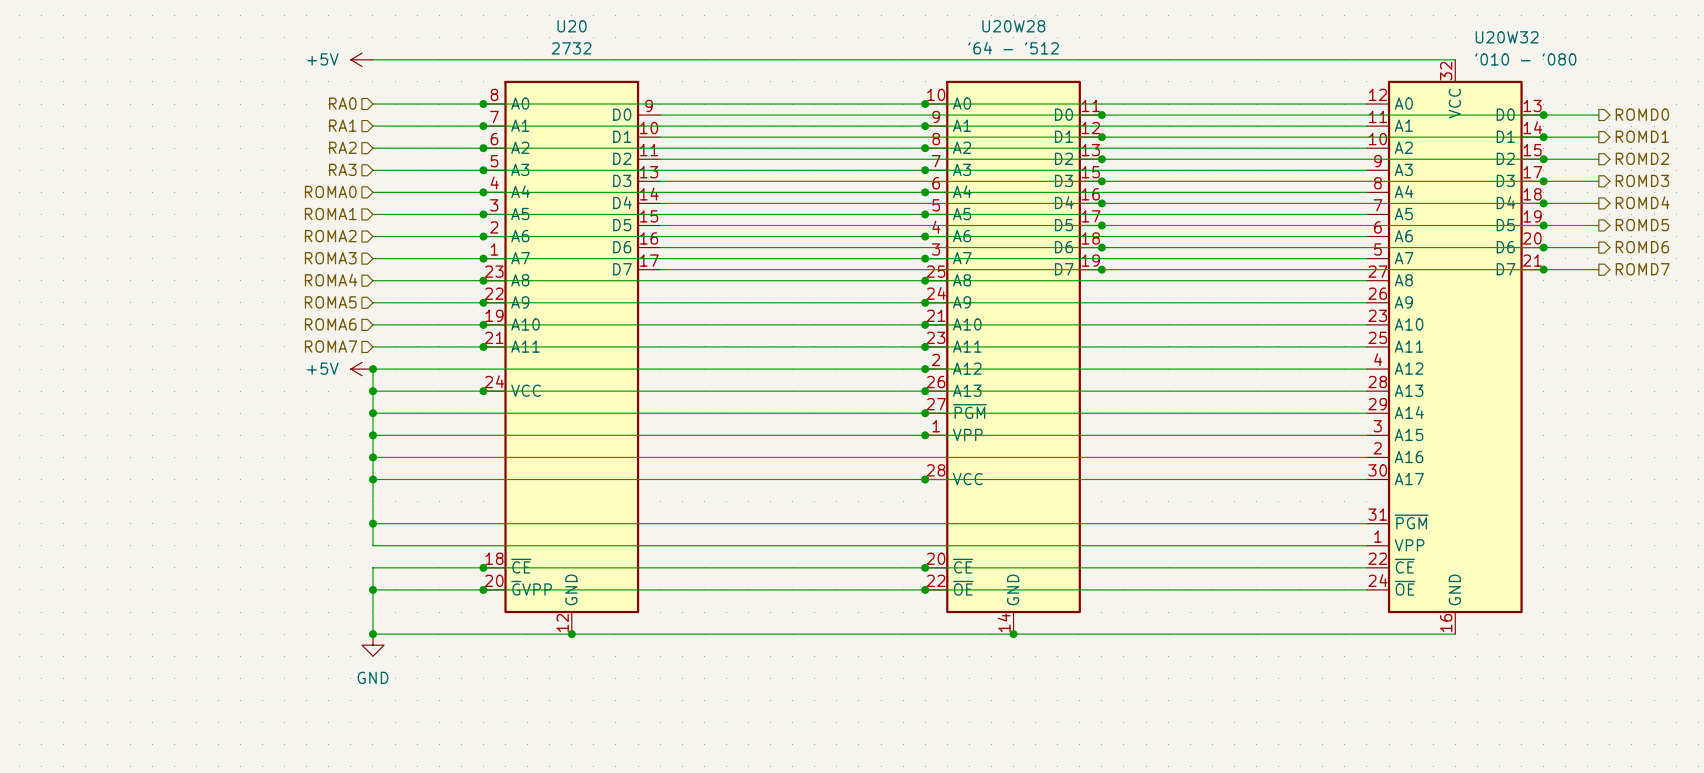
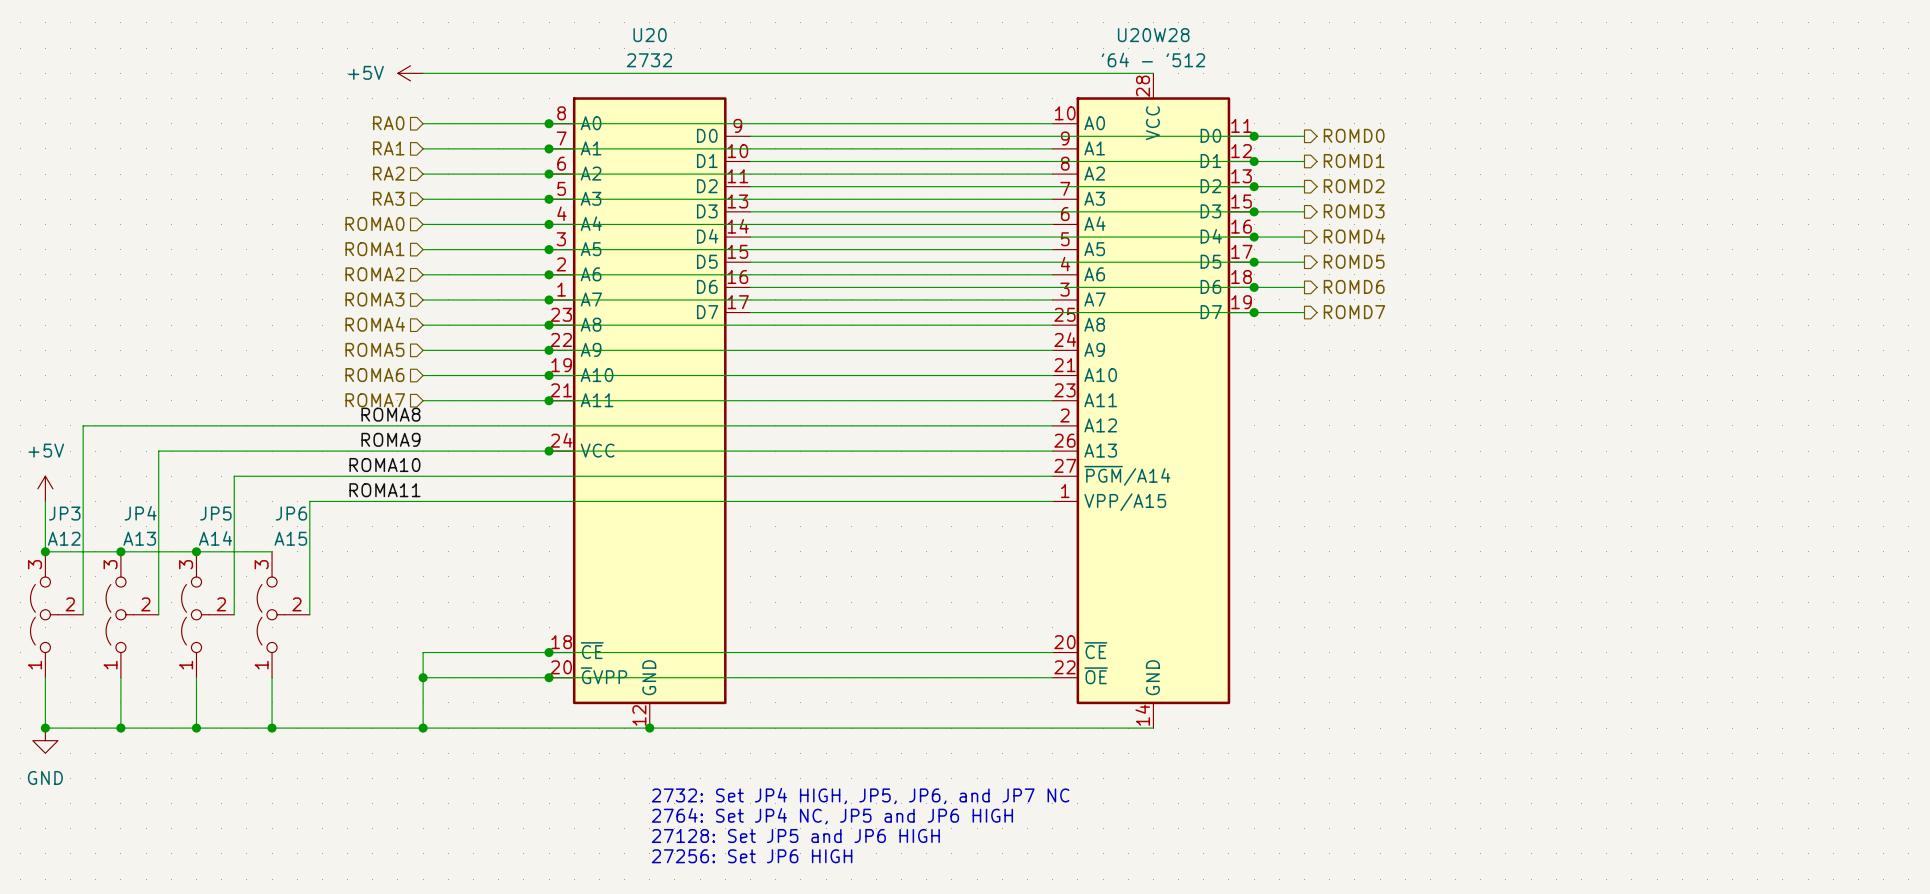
wire: (1013, 59) (1455, 59) -> none
U20W28 symbol: [925, 80, 1102, 635] -> [1052, 73, 1255, 729]
wire: (925, 104) (1366, 104) -> none
junction: (925, 104) -> none
hierarchical label: none -> ROMD0 (1354, 135)
hierarchical label: ROMD0 (1642, 114) -> none
wire: (1146, 115) (1598, 115) -> none
junction: (1543, 115) -> none
wire: (925, 126) (1366, 126) -> none
junction: (925, 126) -> none
hierarchical label: none -> ROMD1 (1354, 161)
hierarchical label: ROMD1 (1642, 136) -> none
wire: (1146, 137) (1598, 137) -> none
junction: (1543, 137) -> none
wire: (925, 148) (1366, 148) -> none
junction: (925, 148) -> none
hierarchical label: none -> ROMD2 (1354, 186)
hierarchical label: ROMD2 (1642, 158) -> none
wire: (1146, 159) (1598, 159) -> none
junction: (1543, 159) -> none
wire: (925, 170) (1366, 170) -> none
junction: (925, 170) -> none
hierarchical label: none -> ROMD3 (1354, 211)
hierarchical label: ROMD3 (1642, 180) -> none
wire: (1146, 181) (1598, 181) -> none
junction: (1543, 181) -> none
wire: (925, 192) (1366, 192) -> none
junction: (925, 192) -> none
hierarchical label: none -> ROMD4 (1354, 236)
hierarchical label: ROMD4 (1642, 202) -> none
wire: (1146, 203) (1598, 203) -> none
junction: (1543, 203) -> none
wire: (925, 214) (1366, 214) -> none
junction: (925, 214) -> none
wire: (1146, 225) (1598, 225) -> none
hierarchical label: none -> ROMD5 (1354, 261)
junction: (1543, 225) -> none
hierarchical label: ROMD5 (1642, 225) -> none
wire: (925, 236) (1366, 236) -> none
junction: (925, 236) -> none
wire: (1146, 247) (1598, 247) -> none
hierarchical label: none -> ROMD6 (1354, 286)
junction: (1543, 247) -> none
hierarchical label: ROMD6 (1642, 247) -> none
wire: (925, 258) (1366, 258) -> none
junction: (925, 258) -> none
wire: (1146, 269) (1598, 269) -> none
hierarchical label: none -> ROMD7 (1354, 312)
junction: (1543, 269) -> none
hierarchical label: ROMD7 (1642, 269) -> none
wire: (925, 280) (1366, 280) -> none
junction: (925, 280) -> none
wire: (925, 302) (1366, 302) -> none
junction: (925, 302) -> none
wire: (925, 324) (1366, 324) -> none
junction: (925, 324) -> none
wire: (925, 346) (1366, 346) -> none
junction: (925, 346) -> none
U20W32: '010 - '080 (1455, 346) -> none
label: none -> ROMA8 (390, 414)
power symbol: +5V (361, 369) -> none
wire: (372, 369) (372, 545) (1366, 545) -> (423, 425) (83, 425) (83, 614)
junction: (372, 369) -> none
wire: (925, 369) (1366, 369) -> none
junction: (925, 369) -> none
label: none -> ROMA9 (390, 439)
wire: none -> (423, 451) (158, 451) (158, 614)
junction: (372, 391) -> none
wire: (925, 391) (1366, 391) -> none
junction: (925, 391) -> none
label: none -> ROMA10 (384, 465)
wire: none -> (423, 476) (234, 476) (234, 614)
junction: (372, 413) -> none
wire: (925, 413) (1366, 413) -> none
junction: (925, 413) -> none
power symbol: none -> +5V (45, 488)
label: none -> ROMA11 (384, 490)
wire: none -> (45, 501) (45, 551) (272, 551)
wire: none -> (423, 501) (309, 501) (309, 614)
junction: (372, 435) -> none
wire: (925, 435) (1366, 435) -> none
junction: (925, 435) -> none
wire: (372, 457) (1366, 457) -> none
junction: (372, 457) -> none
junction: none -> (45, 551)
junction: none -> (120, 551)
junction: none -> (196, 551)
wire: (372, 479) (1366, 479) -> none
junction: (372, 479) -> none
junction: (925, 479) -> none
wire: (372, 523) (1366, 523) -> none
junction: (372, 523) -> none
JP3: none -> A12 (56, 614)
JP4: none -> A13 (132, 614)
JP5: none -> A14 (207, 614)
JP6: none -> A15 (283, 614)
wire: (925, 567) (1366, 567) -> none
junction: (925, 567) -> none
wire: none -> (45, 677) (45, 728) (423, 728)
wire: none -> (120, 677) (120, 728)
wire: none -> (196, 677) (196, 728)
wire: none -> (272, 677) (272, 728)
wire: (925, 589) (1366, 589) -> none
junction: (925, 589) -> none
junction: none -> (45, 728)
junction: none -> (120, 728)
junction: none -> (196, 728)
junction: none -> (272, 728)
wire: (1013, 634) (1455, 634) -> none
junction: (1013, 634) -> none
power symbol: none -> GND (45, 740)
power symbol: GND (372, 645) -> none
text: none -> 2732: Set JP4 HIGH, JP5, JP6, and JP7 NC (860, 796)
text: none -> 2764: Set JP4 NC, JP5 and JP6 HIGH (832, 816)
text: none -> 27128: Set JP5 and JP6 HIGH (795, 836)
text: none -> 27256: Set JP6 HIGH (752, 856)

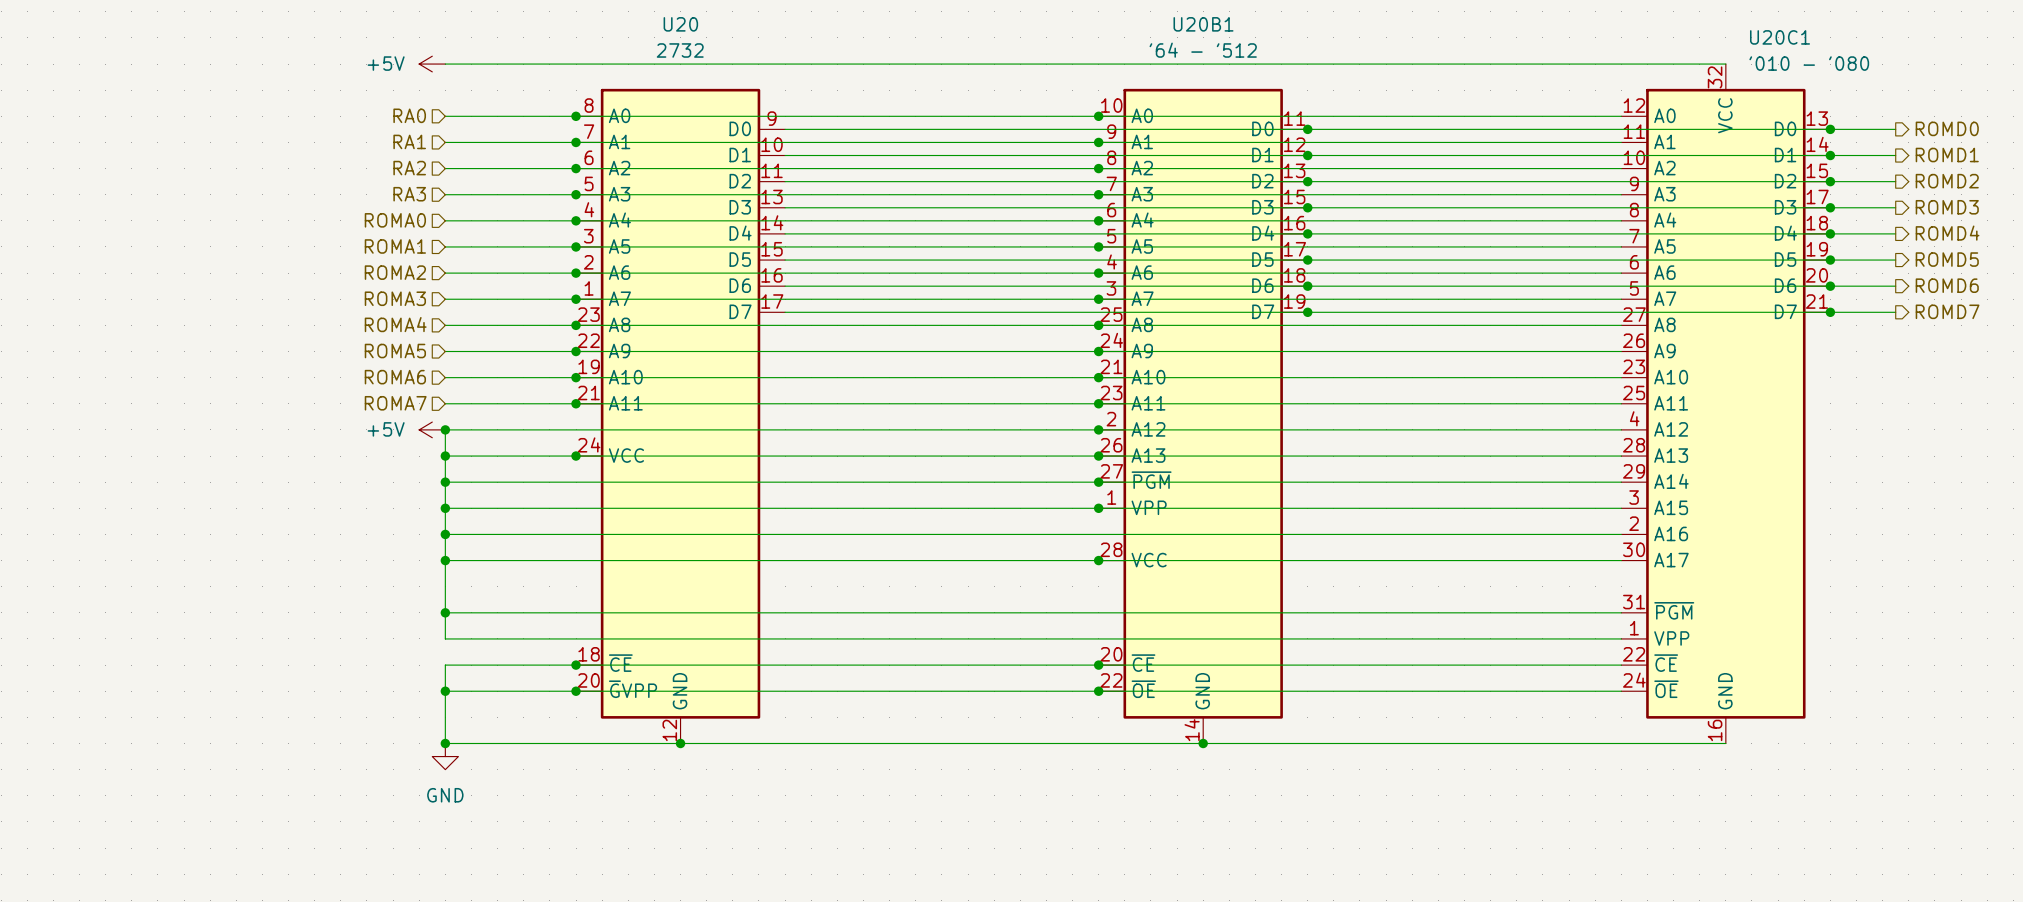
wire: none -> (1203, 64) (1725, 64)
wire: none -> (1098, 116) (1621, 116)
junction: none -> (1098, 116)
hierarchical label: ROMD0 (1354, 135) -> none
hierarchical label: none -> ROMD0 (1947, 128)
wire: none -> (1359, 129) (1895, 129)
junction: none -> (1830, 129)
wire: none -> (1098, 142) (1621, 142)
junction: none -> (1098, 142)
wire: none -> (1359, 155) (1895, 155)
hierarchical label: ROMD1 (1354, 161) -> none
junction: none -> (1830, 155)
hierarchical label: none -> ROMD1 (1947, 155)
wire: none -> (1098, 168) (1621, 168)
junction: none -> (1098, 168)
wire: none -> (1359, 181) (1895, 181)
hierarchical label: ROMD2 (1354, 186) -> none
junction: none -> (1830, 181)
hierarchical label: none -> ROMD2 (1947, 181)
wire: none -> (1098, 194) (1621, 194)
junction: none -> (1098, 194)
wire: none -> (1359, 207) (1895, 207)
hierarchical label: ROMD3 (1354, 211) -> none
junction: none -> (1830, 207)
hierarchical label: none -> ROMD3 (1947, 207)
wire: none -> (1098, 220) (1621, 220)
junction: none -> (1098, 220)
hierarchical label: ROMD4 (1354, 236) -> none
hierarchical label: none -> ROMD4 (1947, 233)
wire: none -> (1359, 233) (1895, 233)
junction: none -> (1830, 233)
wire: none -> (1098, 246) (1621, 246)
junction: none -> (1098, 246)
hierarchical label: ROMD5 (1354, 261) -> none
hierarchical label: none -> ROMD5 (1947, 259)
wire: none -> (1359, 260) (1895, 260)
junction: none -> (1830, 260)
wire: none -> (1098, 273) (1621, 273)
junction: none -> (1098, 273)
hierarchical label: ROMD6 (1354, 286) -> none
hierarchical label: none -> ROMD6 (1947, 285)
wire: none -> (1359, 286) (1895, 286)
junction: none -> (1830, 286)
wire: none -> (1098, 299) (1621, 299)
junction: none -> (1098, 299)
wire: none -> (1359, 312) (1895, 312)
hierarchical label: ROMD7 (1354, 312) -> none
junction: none -> (1830, 312)
hierarchical label: none -> ROMD7 (1947, 311)
wire: none -> (1098, 325) (1621, 325)
junction: none -> (1098, 325)
wire: none -> (1098, 351) (1621, 351)
junction: none -> (1098, 351)
wire: none -> (1098, 377) (1621, 377)
junction: none -> (1098, 377)
wire: none -> (1098, 403) (1621, 403)
junction: none -> (1098, 403)
U20W28: '64 - '512 (1153, 400) -> none
U20C1: none -> '010 - '080 (1725, 403)
U20B1: none -> '64 - '512 (1203, 416)
label: ROMA8 (390, 414) -> none
power symbol: none -> +5V (432, 429)
wire: (423, 425) (83, 425) (83, 614) -> (445, 429) (445, 638) (1621, 638)
junction: none -> (445, 429)
wire: none -> (1098, 429) (1621, 429)
junction: none -> (1098, 429)
label: ROMA9 (390, 439) -> none
wire: (423, 451) (158, 451) (158, 614) -> none
junction: none -> (445, 456)
wire: none -> (1098, 456) (1621, 456)
junction: none -> (1098, 456)
label: ROMA10 (384, 465) -> none
wire: (423, 476) (234, 476) (234, 614) -> none
junction: none -> (445, 482)
wire: none -> (1098, 482) (1621, 482)
junction: none -> (1098, 482)
power symbol: +5V (45, 488) -> none
label: ROMA11 (384, 490) -> none
wire: (45, 501) (45, 551) (272, 551) -> none
wire: (423, 501) (309, 501) (309, 614) -> none
junction: none -> (445, 508)
wire: none -> (1098, 508) (1621, 508)
junction: none -> (1098, 508)
wire: none -> (445, 534) (1621, 534)
junction: none -> (445, 534)
junction: (45, 551) -> none
junction: (120, 551) -> none
junction: (196, 551) -> none
wire: none -> (445, 560) (1621, 560)
junction: none -> (445, 560)
junction: none -> (1098, 560)
wire: none -> (445, 612) (1621, 612)
junction: none -> (445, 612)
JP3: A12 (56, 614) -> none
JP4: A13 (132, 614) -> none
JP5: A14 (207, 614) -> none
JP6: A15 (283, 614) -> none
wire: none -> (1098, 665) (1621, 665)
junction: none -> (1098, 665)
wire: (45, 677) (45, 728) (423, 728) -> none
wire: (120, 677) (120, 728) -> none
wire: (196, 677) (196, 728) -> none
wire: (272, 677) (272, 728) -> none
wire: none -> (1098, 691) (1621, 691)
junction: none -> (1098, 691)
junction: (45, 728) -> none
junction: (120, 728) -> none
junction: (196, 728) -> none
junction: (272, 728) -> none
wire: none -> (1203, 743) (1725, 743)
junction: none -> (1203, 743)
power symbol: GND (45, 740) -> none
power symbol: none -> GND (445, 756)
text: 2732: Set JP4 HIGH, JP5, JP6, and JP7 NC (860, 796) -> none
text: 2764: Set JP4 NC, JP5 and JP6 HIGH (832, 816) -> none
text: 27128: Set JP5 and JP6 HIGH (795, 836) -> none
text: 27256: Set JP6 HIGH (752, 856) -> none

